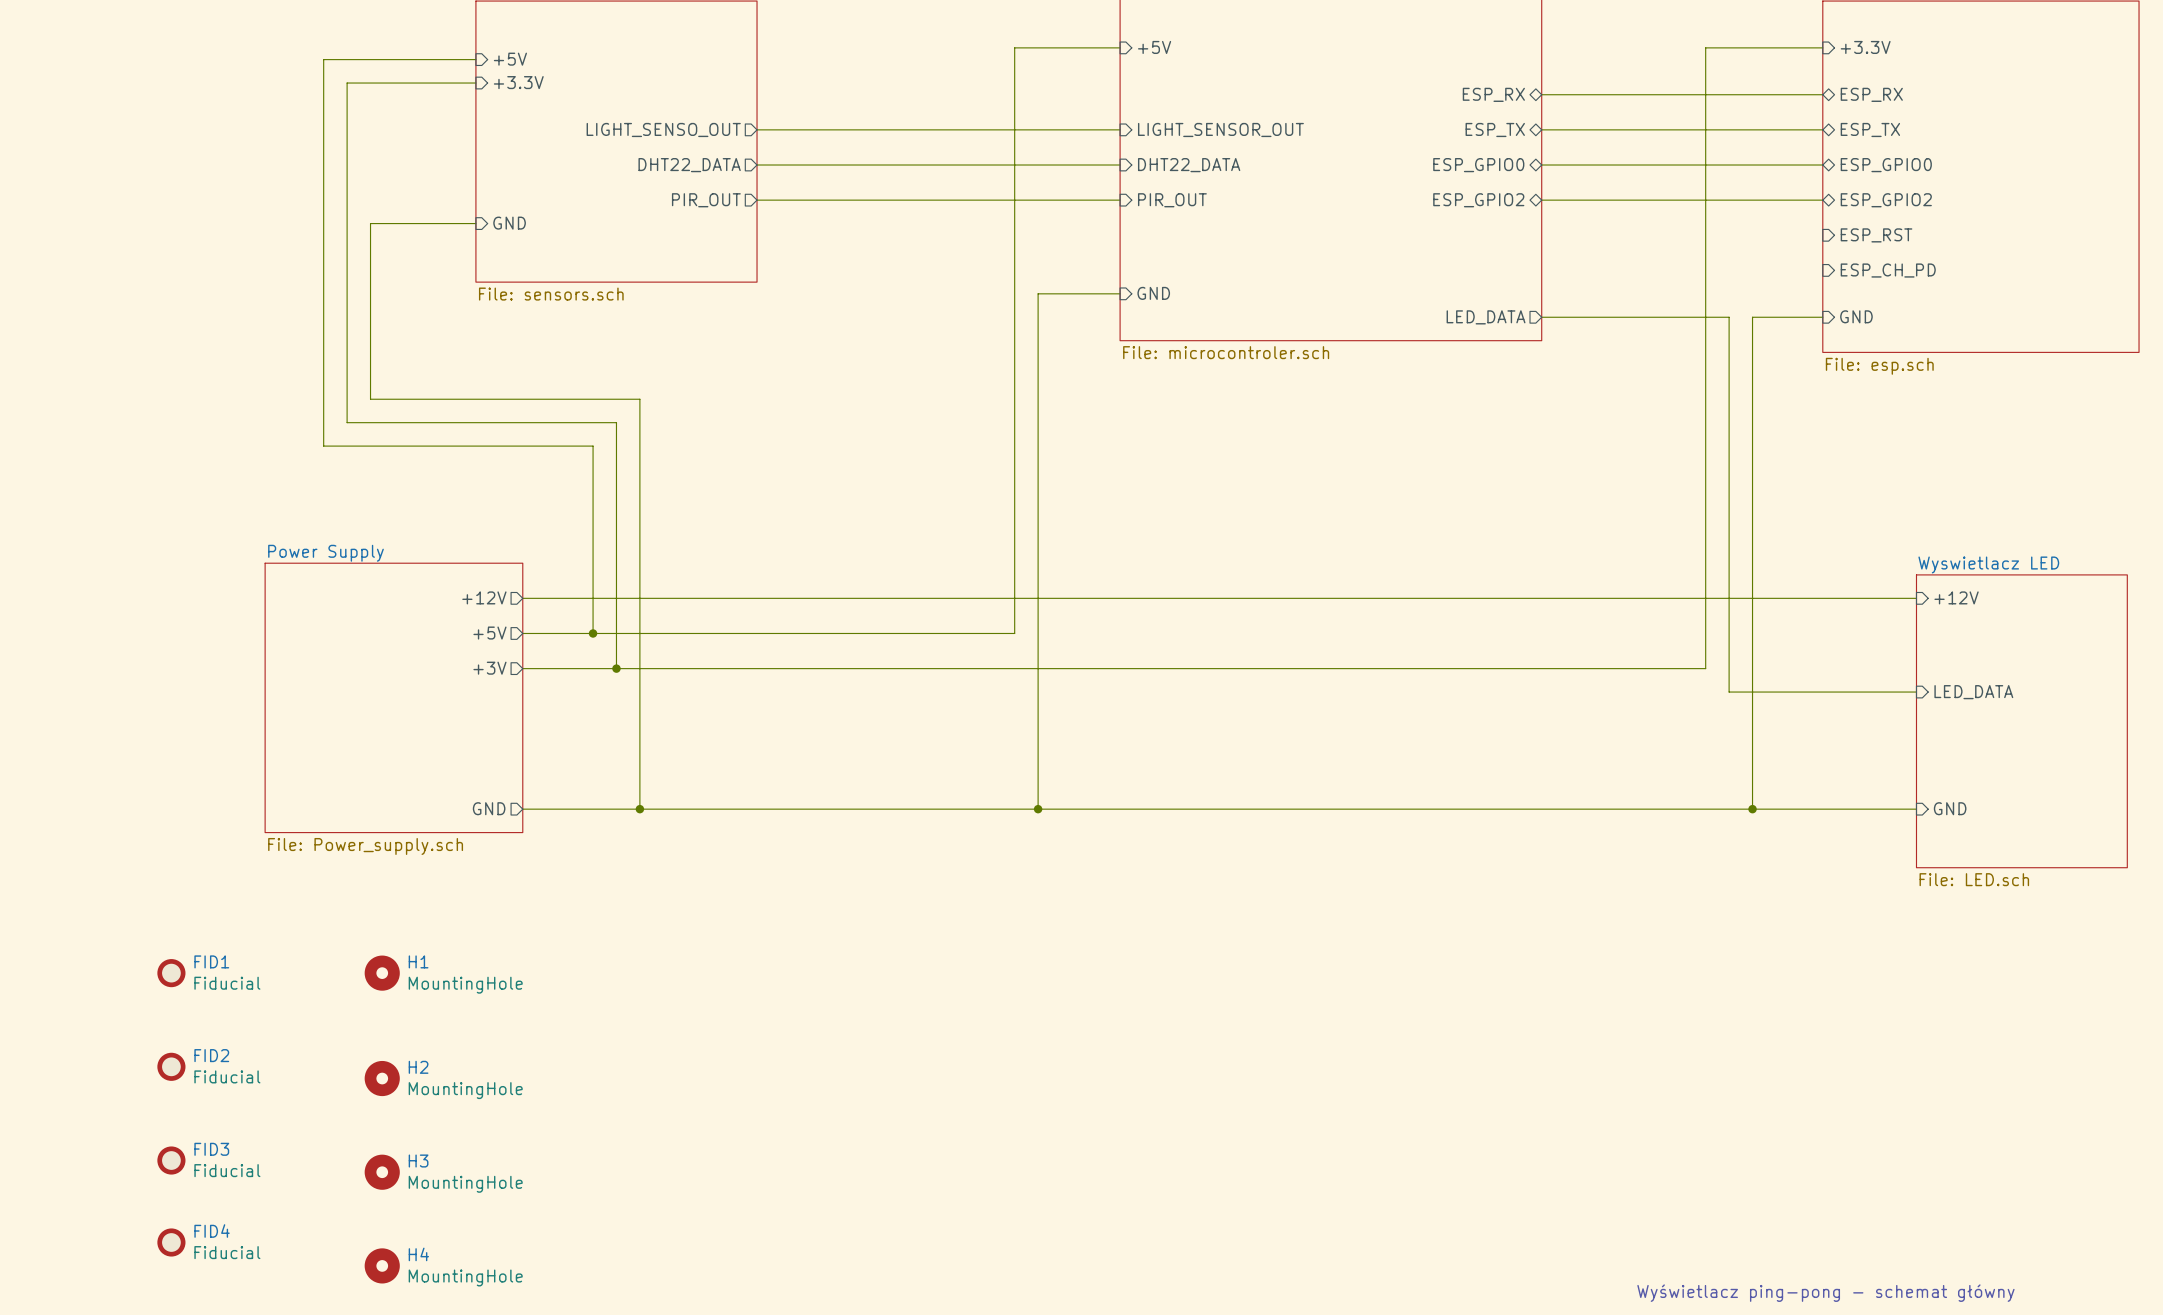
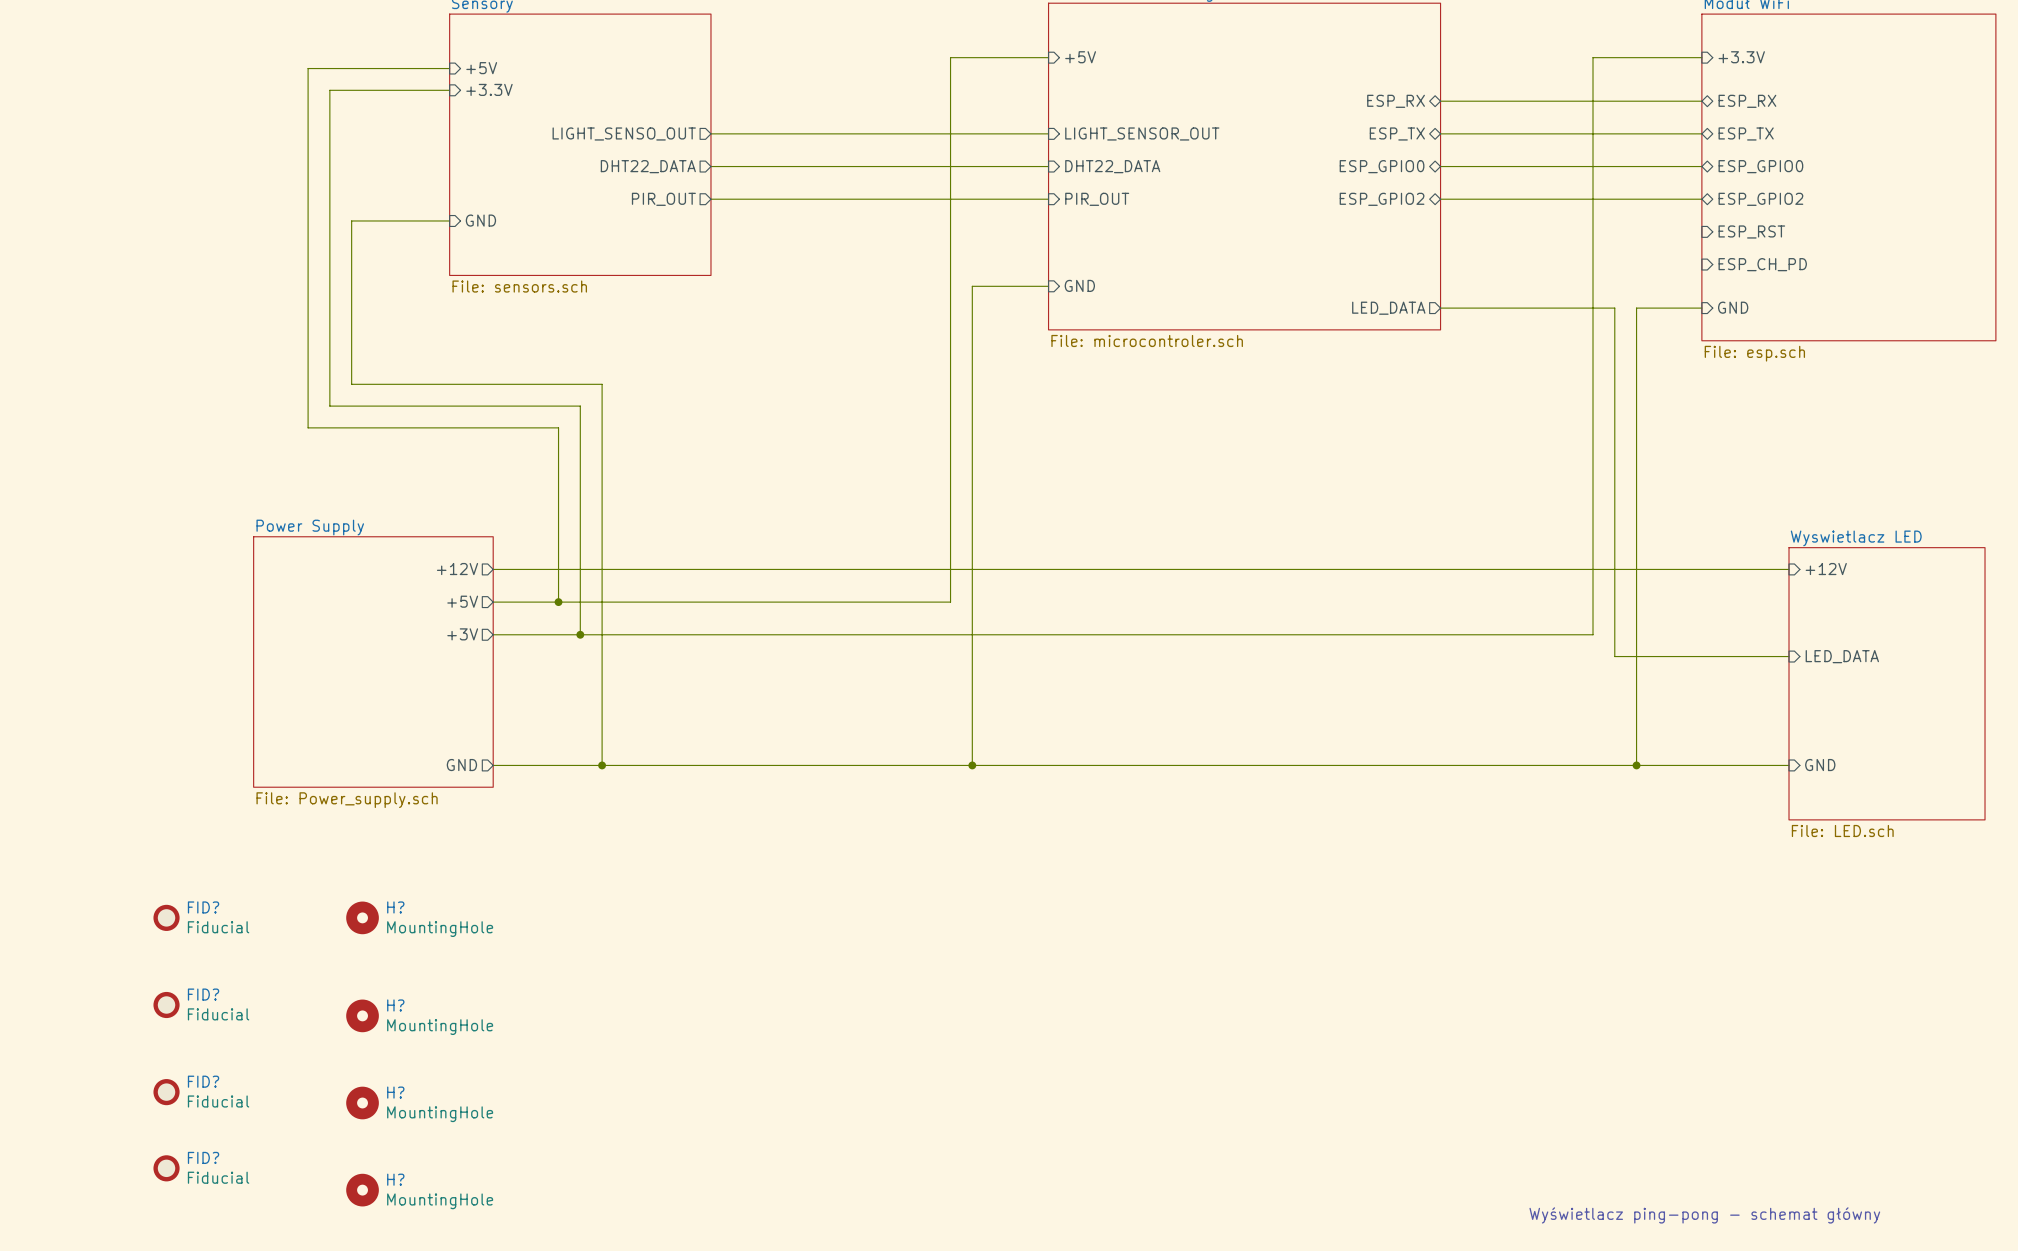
FID1 name: FID1 (211, 961) -> FID? (203, 907)
H1 name: H1 (418, 961) -> H? (395, 907)
FID2 name: FID2 (211, 1055) -> FID? (203, 994)
H2 name: H2 (418, 1067) -> H? (395, 1005)
FID3 name: FID3 (211, 1149) -> FID? (203, 1081)
H3 name: H3 (418, 1161) -> H? (395, 1092)
FID4 name: FID4 (212, 1231) -> FID? (203, 1157)
H4 name: H4 (418, 1254) -> H? (395, 1179)

